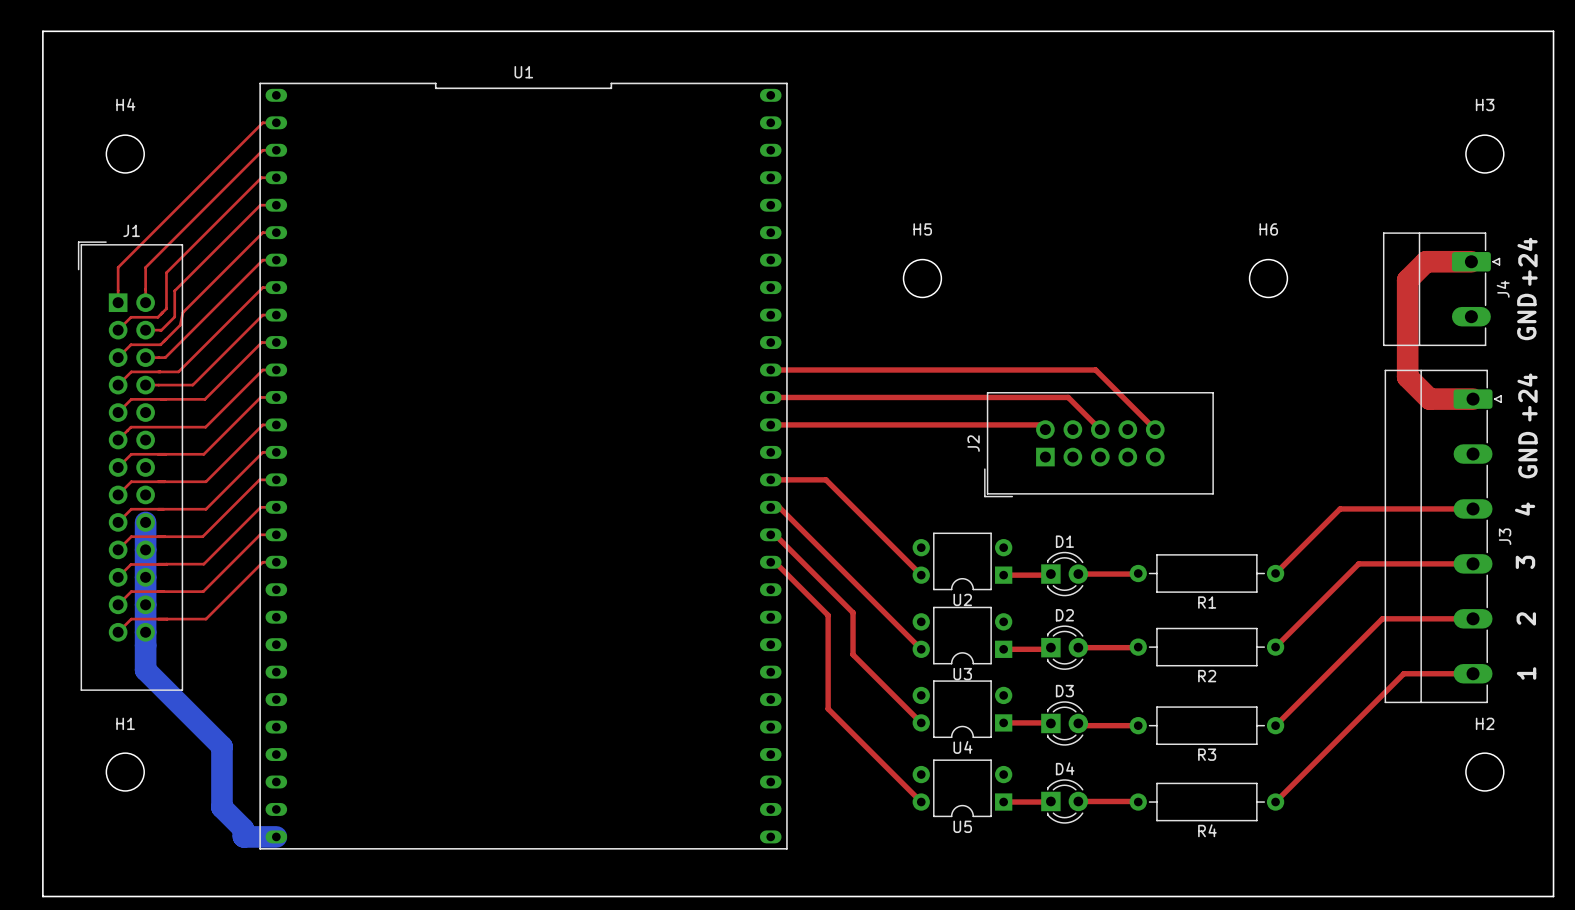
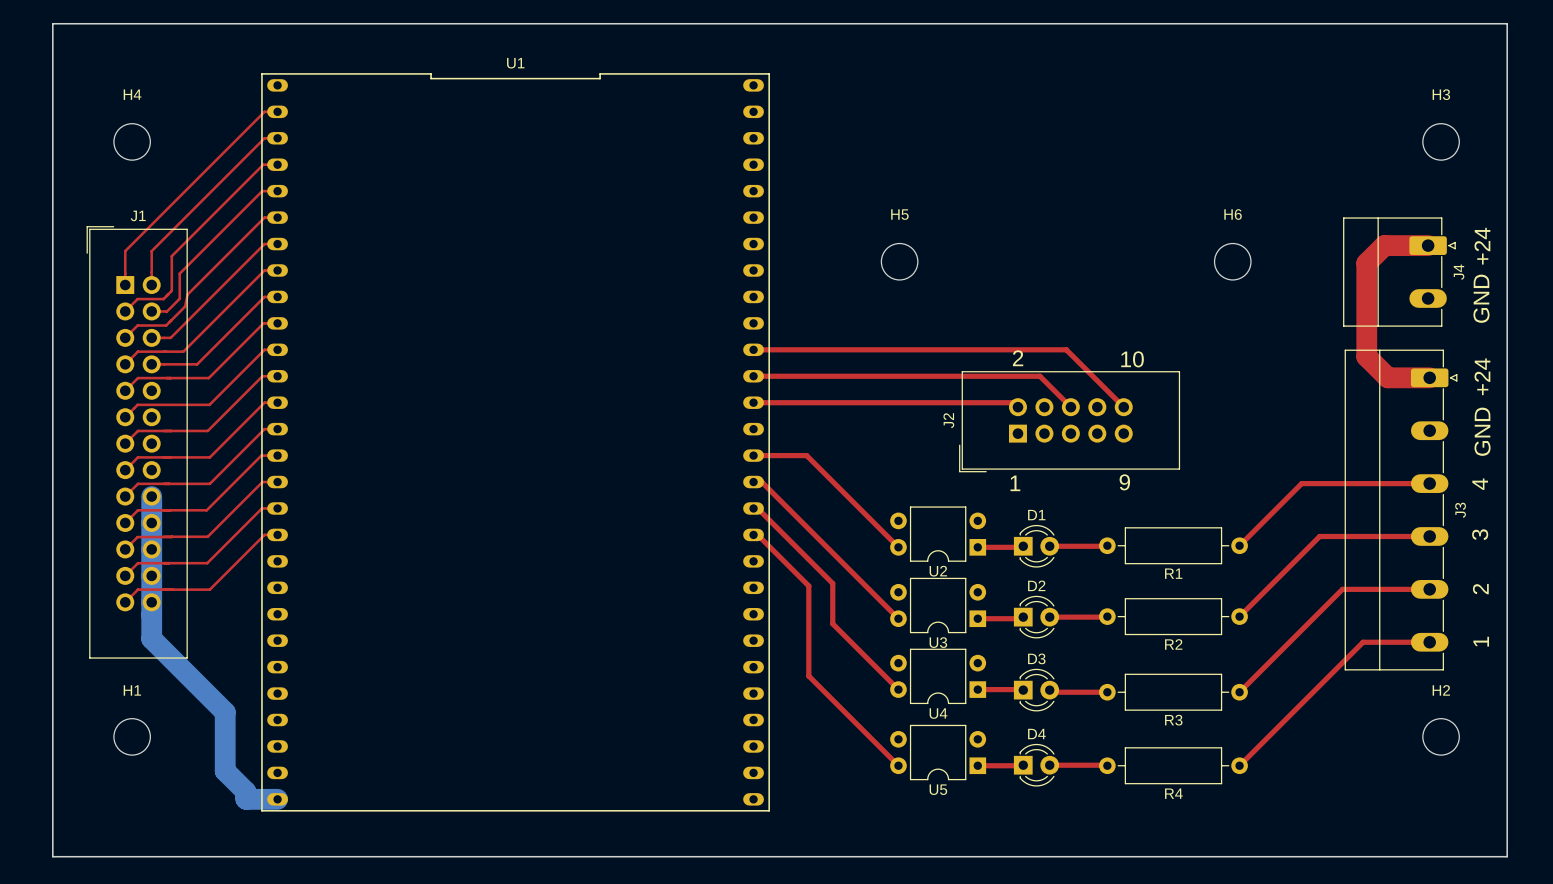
text: none -> 2 (1018, 358)
text: none -> 10 (1132, 359)
text: none -> 9 (1124, 482)
text: none -> 1 (1015, 483)

